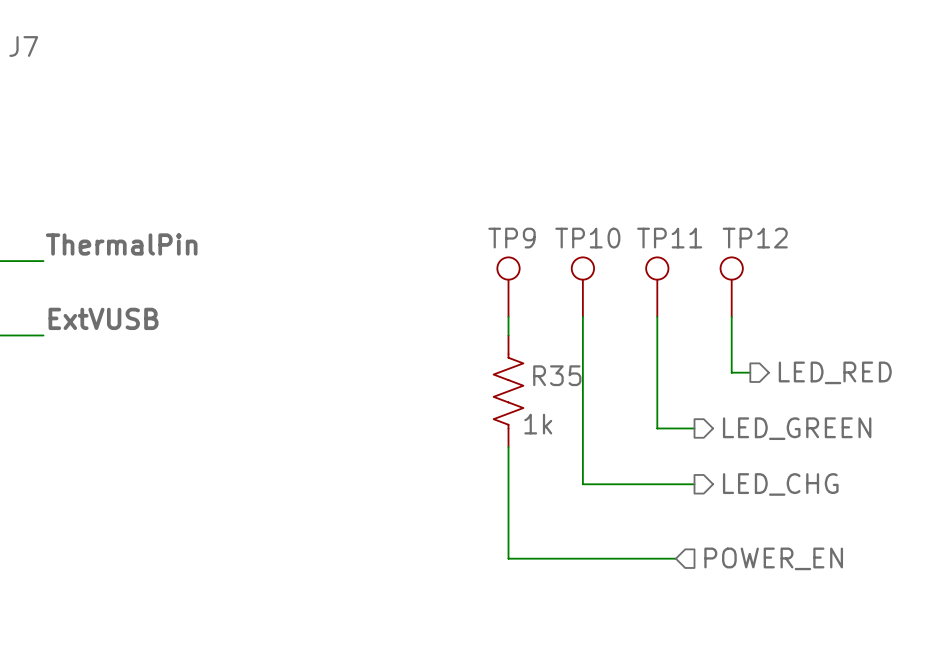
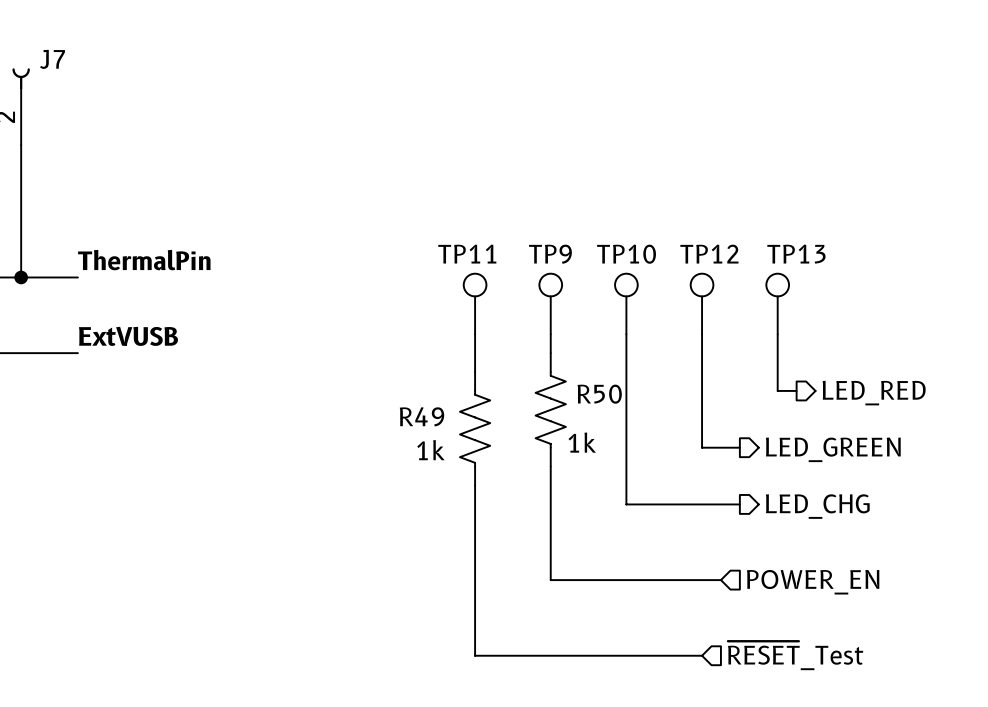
TP11 name: TP11 (669, 238) -> TP12 (709, 254)
TP12 name: TP12 (755, 238) -> TP13 (796, 254)
TP11: none -> (475, 303)
wire: none -> (475, 334) (475, 372)
R35 name: R35 (557, 375) -> R50 (599, 394)
R49: none -> 1k (475, 428)
wire: none -> (475, 485) (475, 655) (702, 655)
hierarchical label: none -> ~{RESET}_Test (795, 655)

